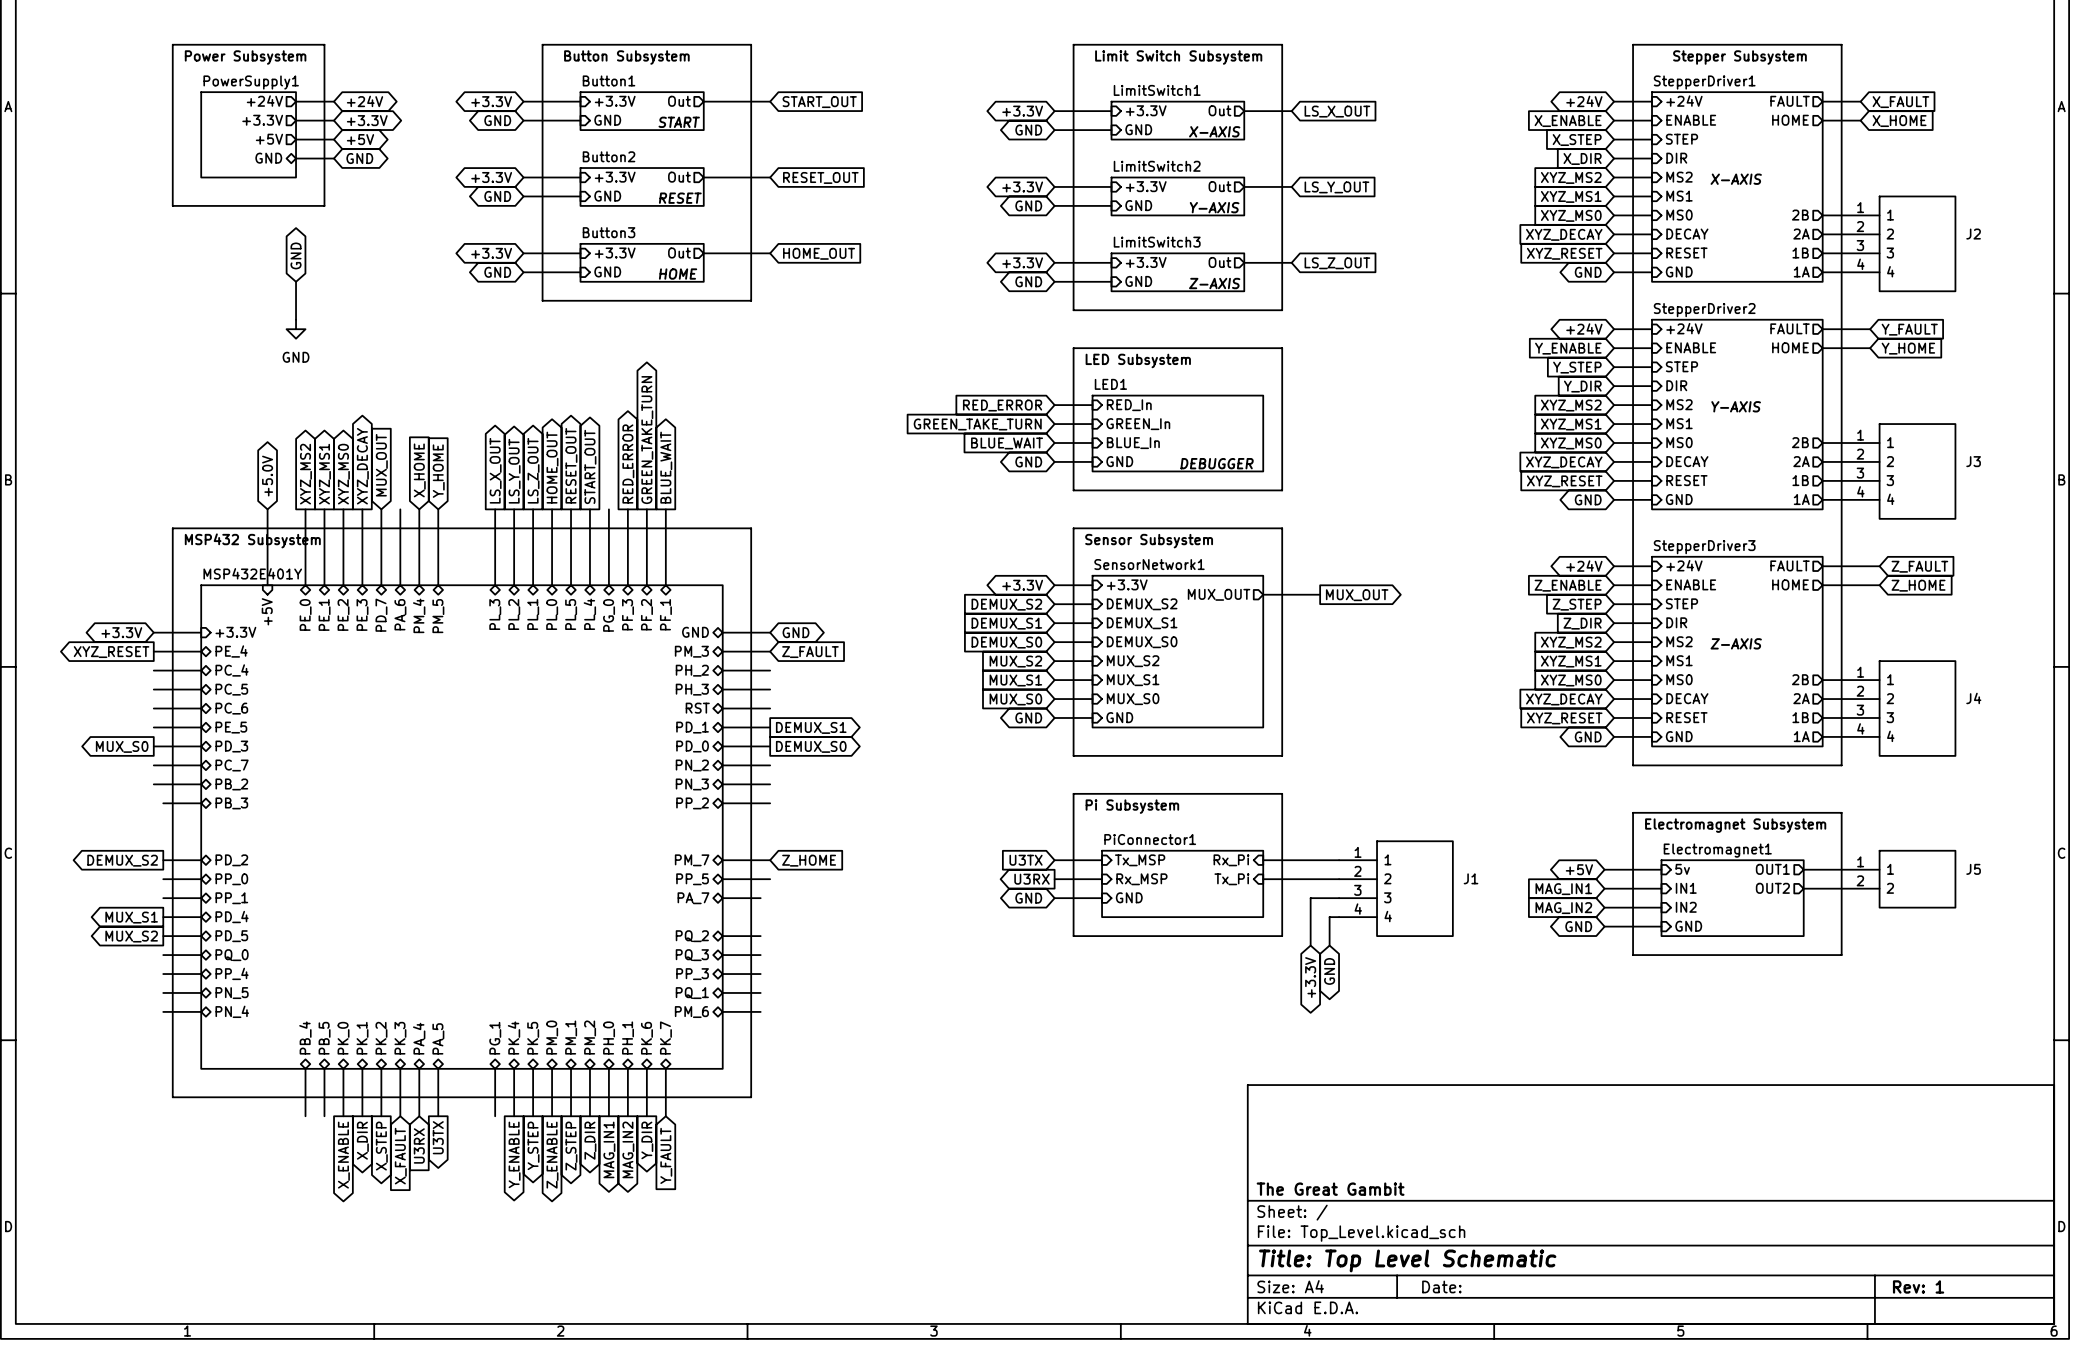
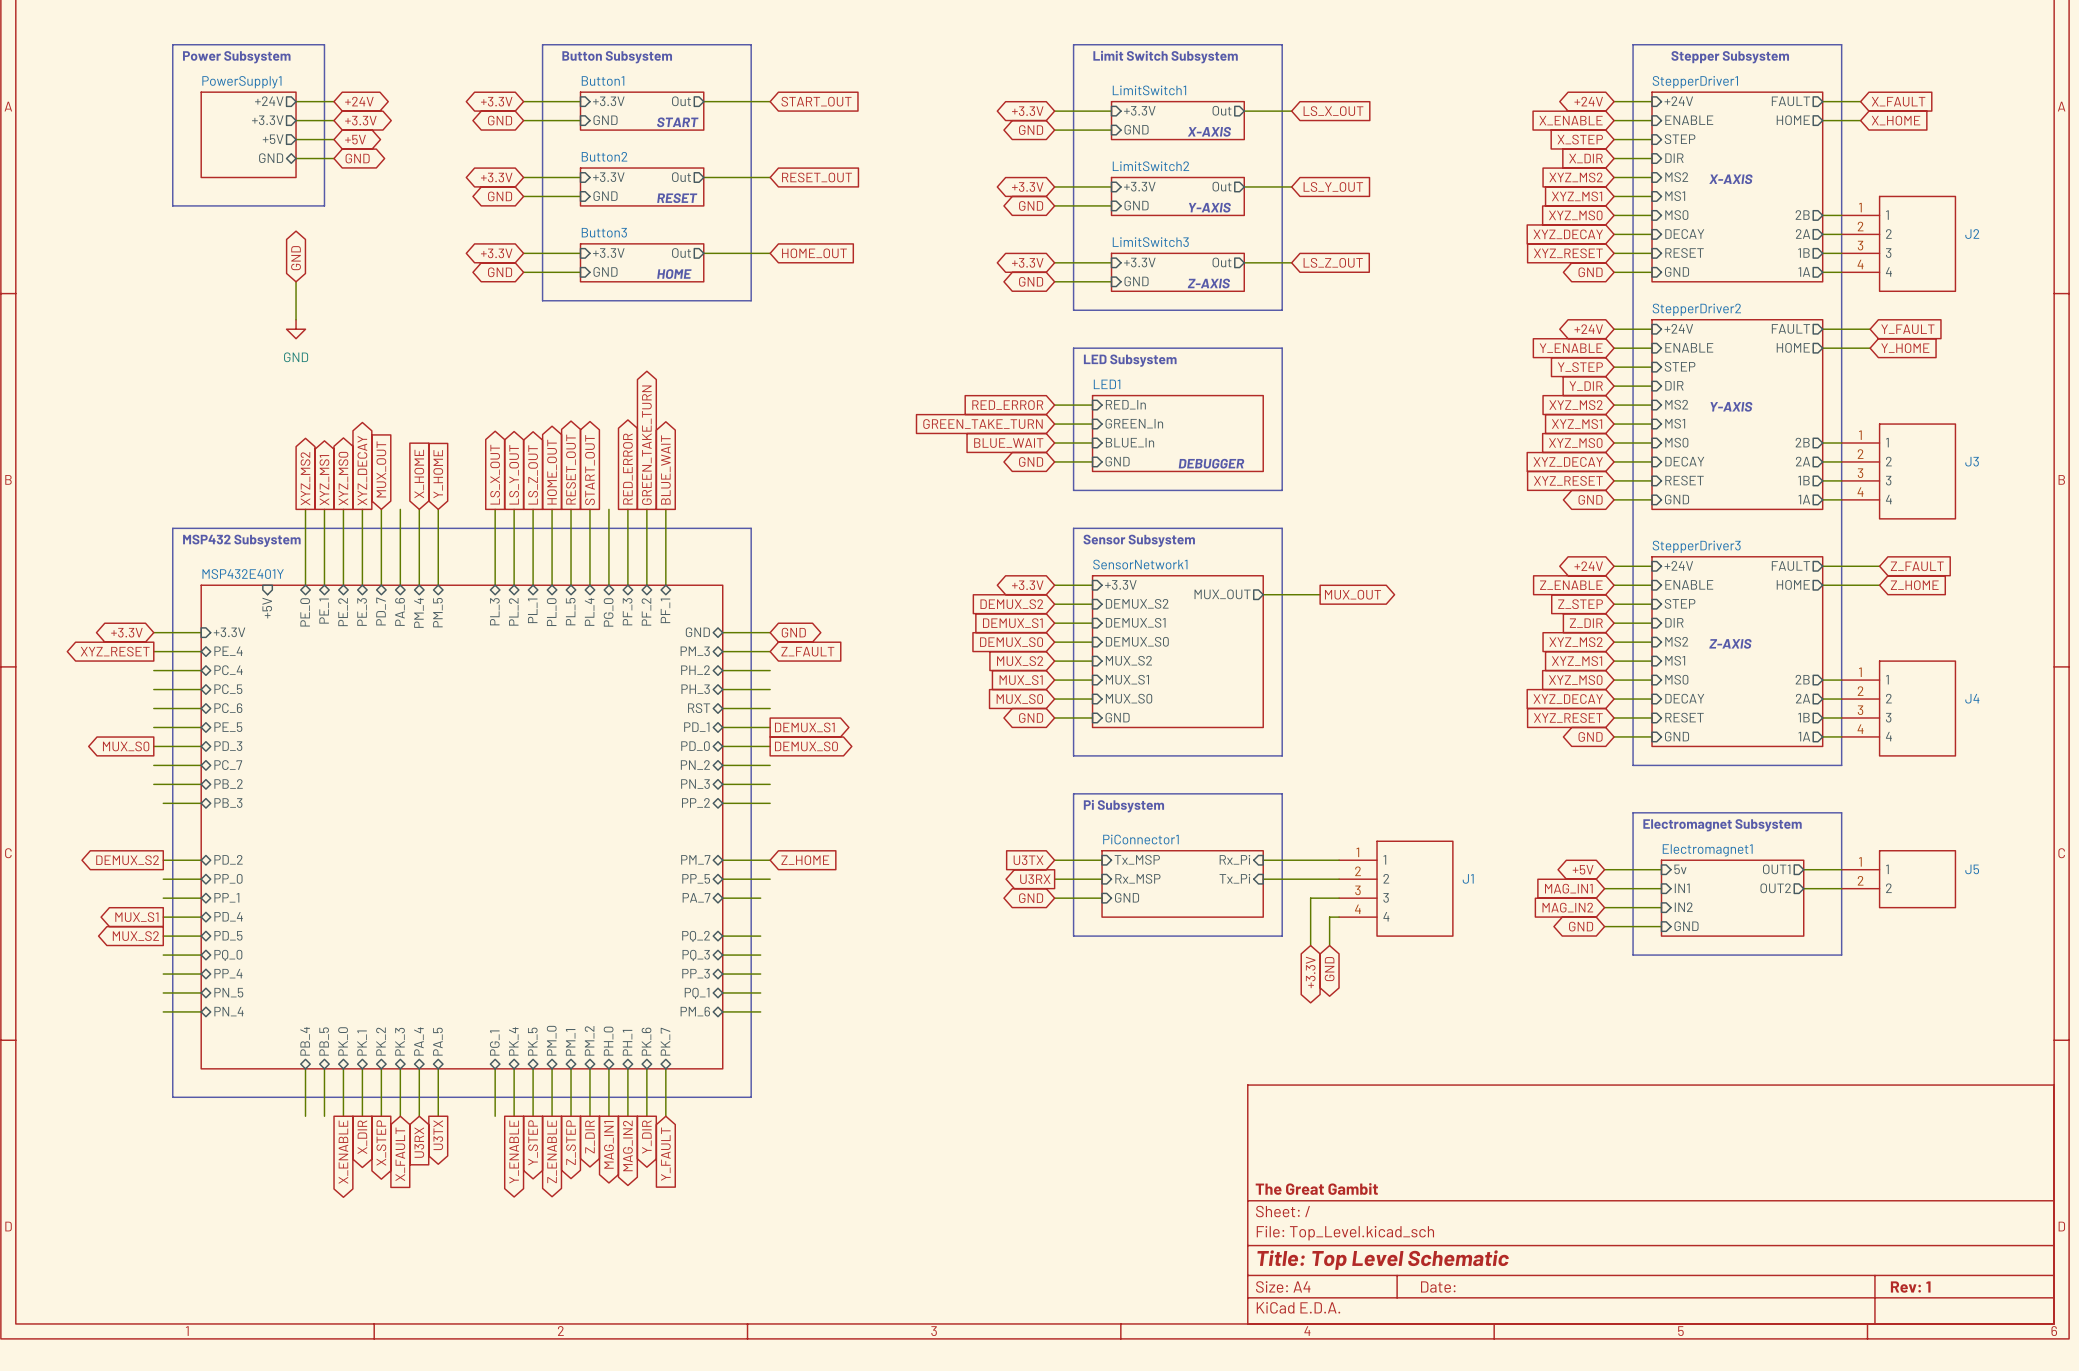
global label: +5.0V (267, 476) -> none
wire: (267, 509) (267, 585) -> none

